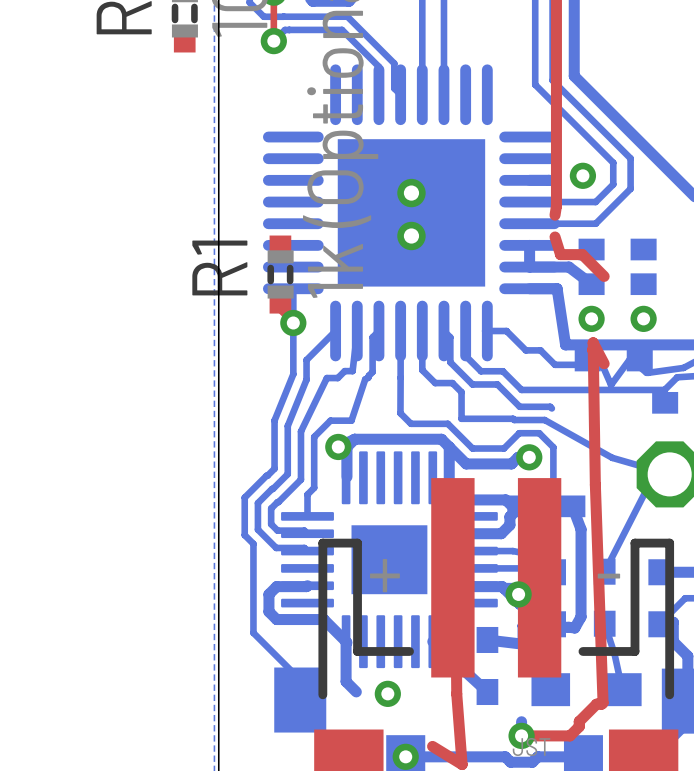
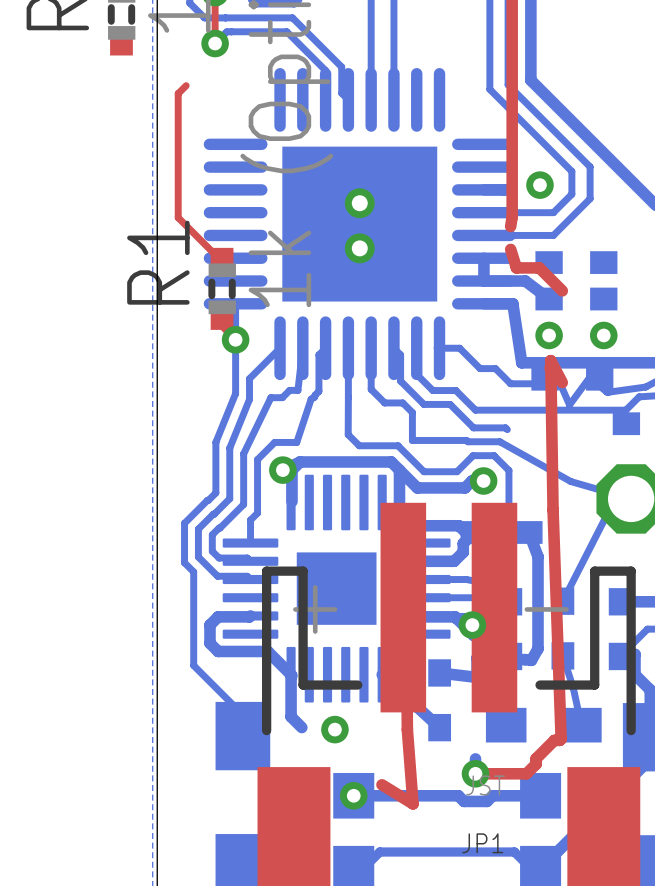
top track: none -> (186, 85) (178, 93) (178, 217) (222, 261)

